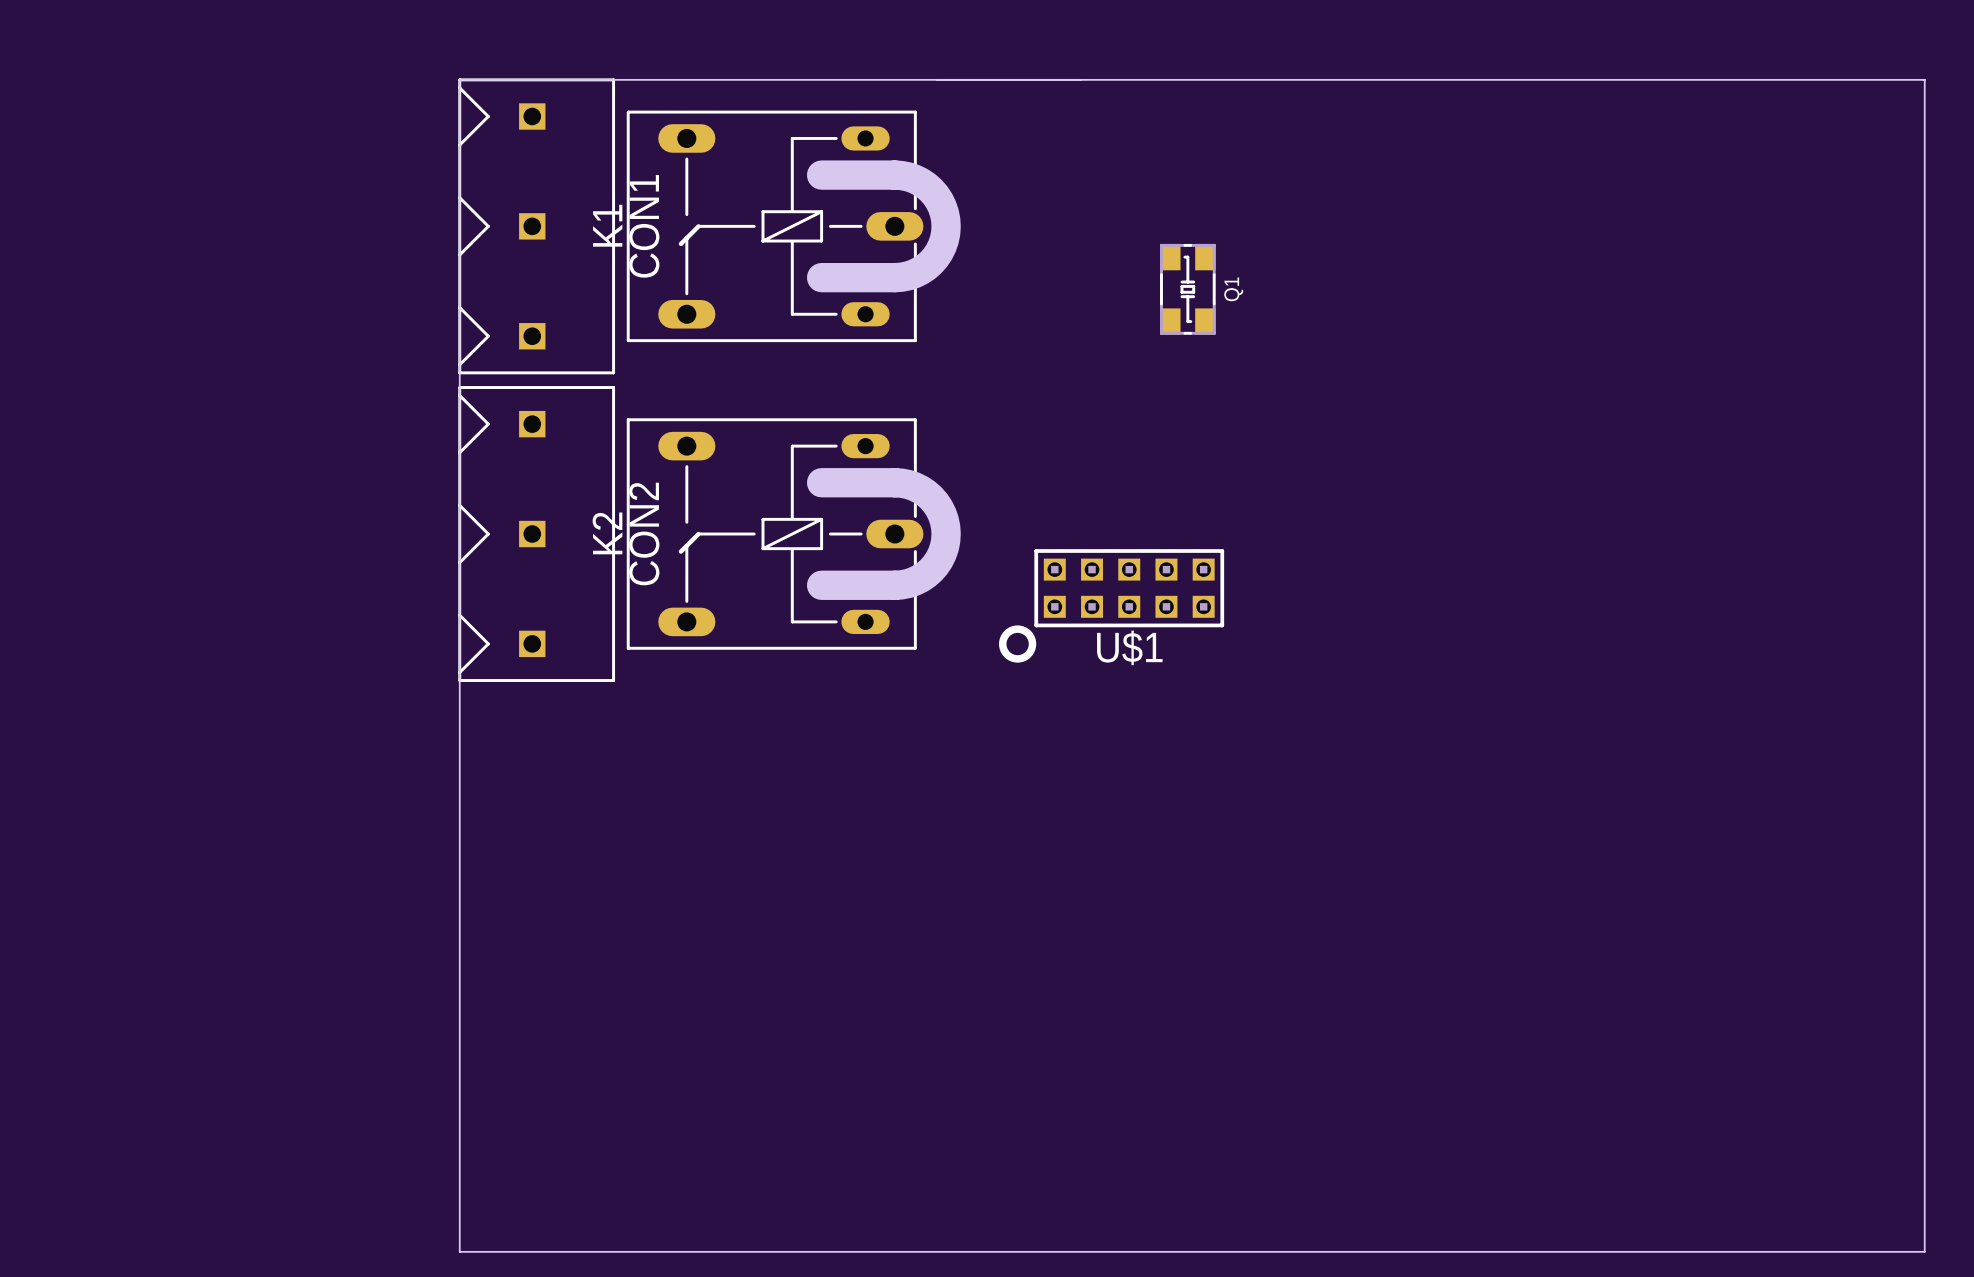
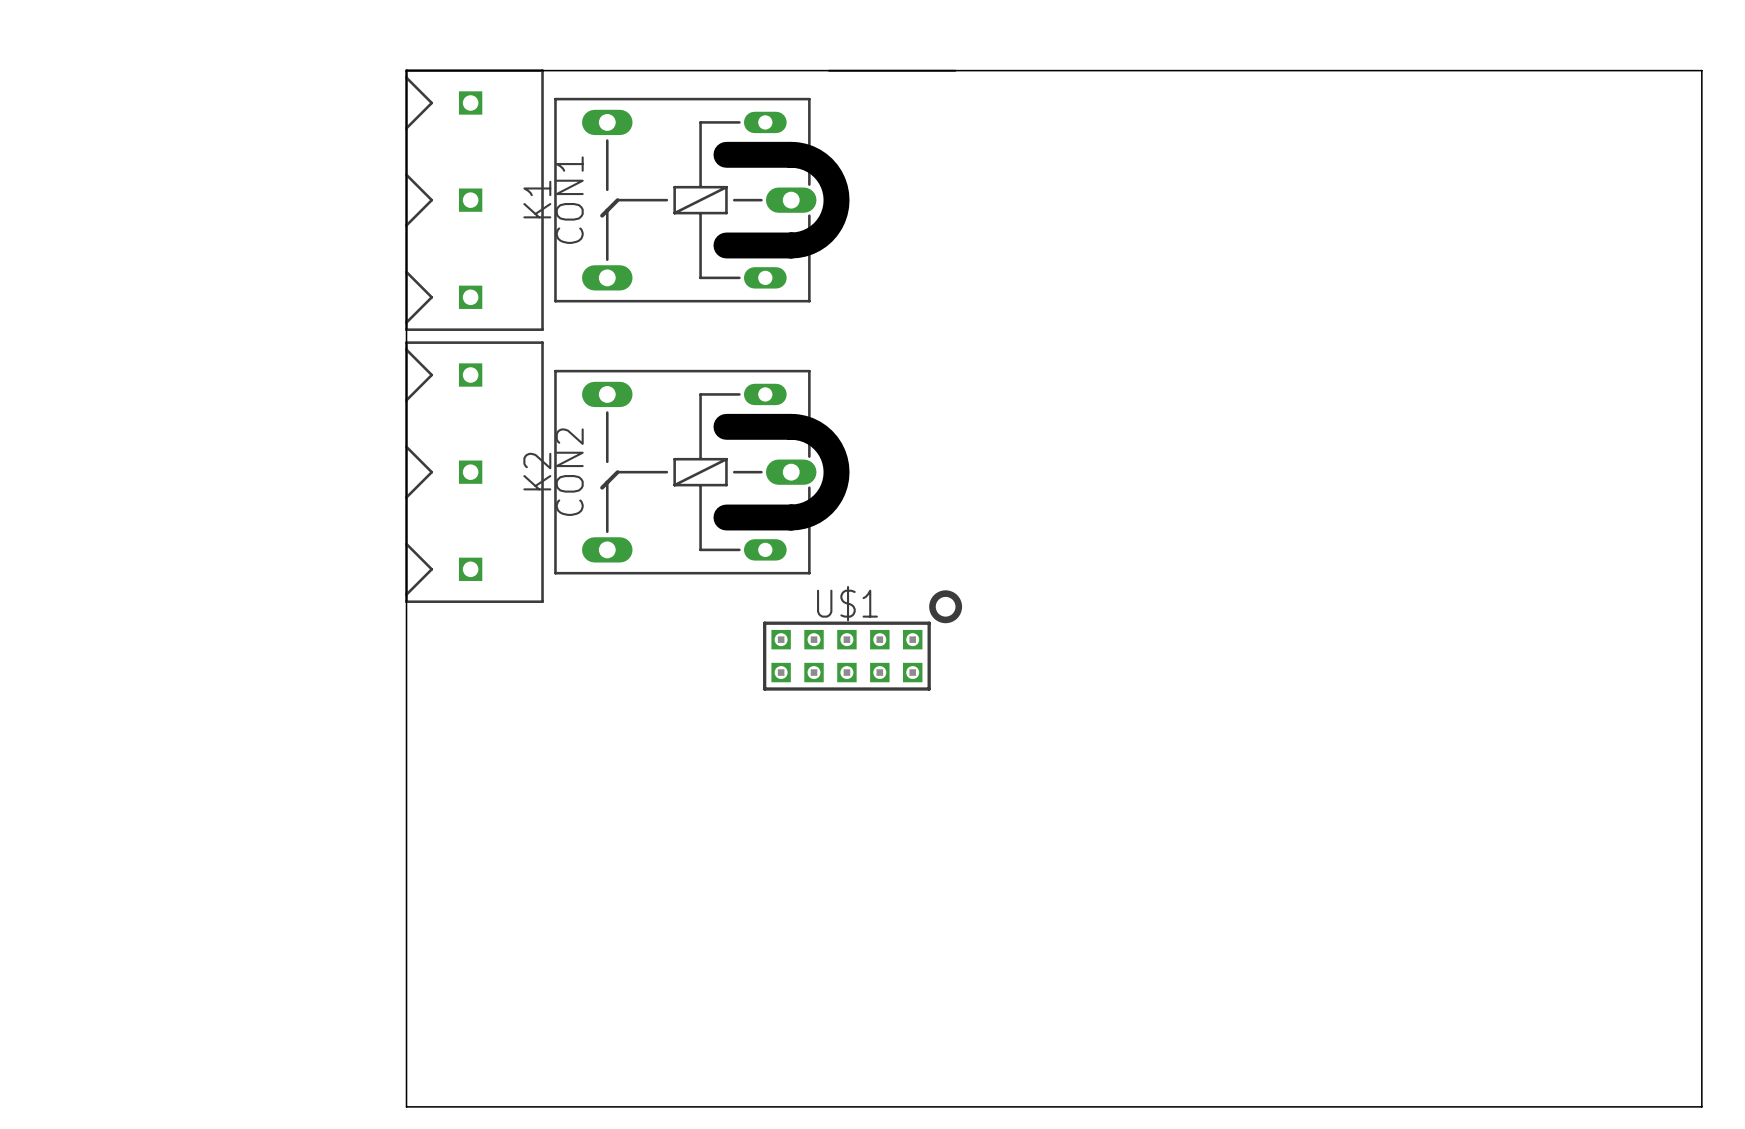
Q1: (1187, 289) -> none
U$1 rotation: 0° (1111, 605) -> 180° (862, 640)
U$1 position: (1111, 605) -> (862, 640)

